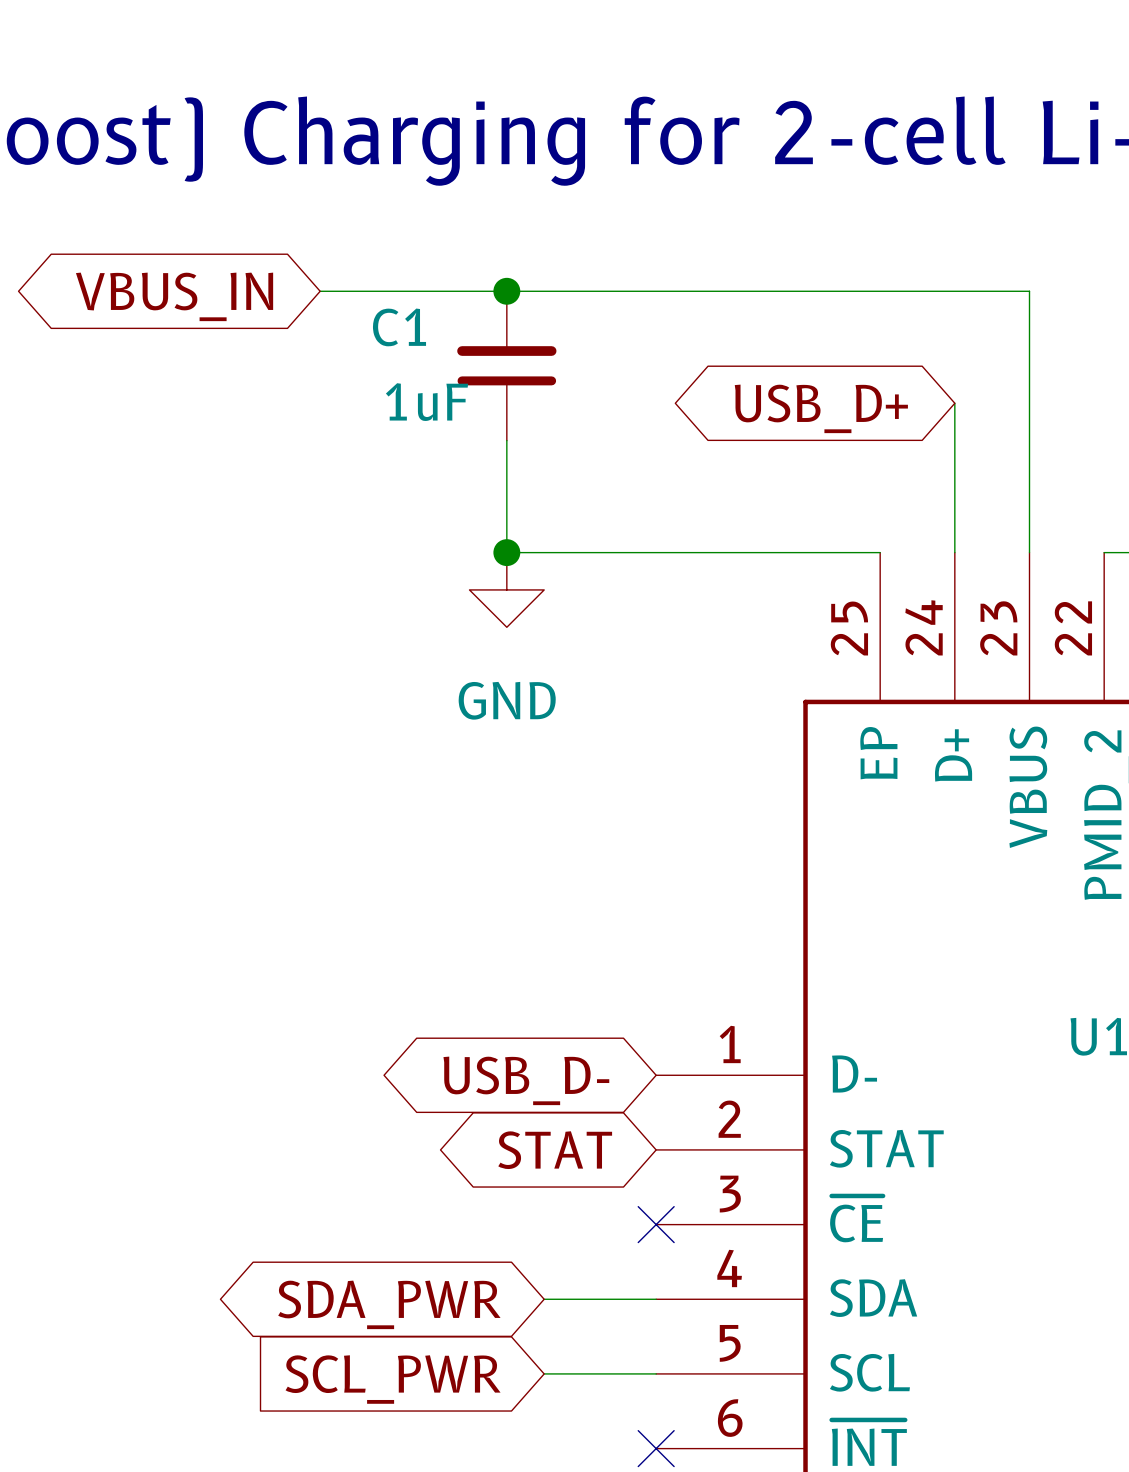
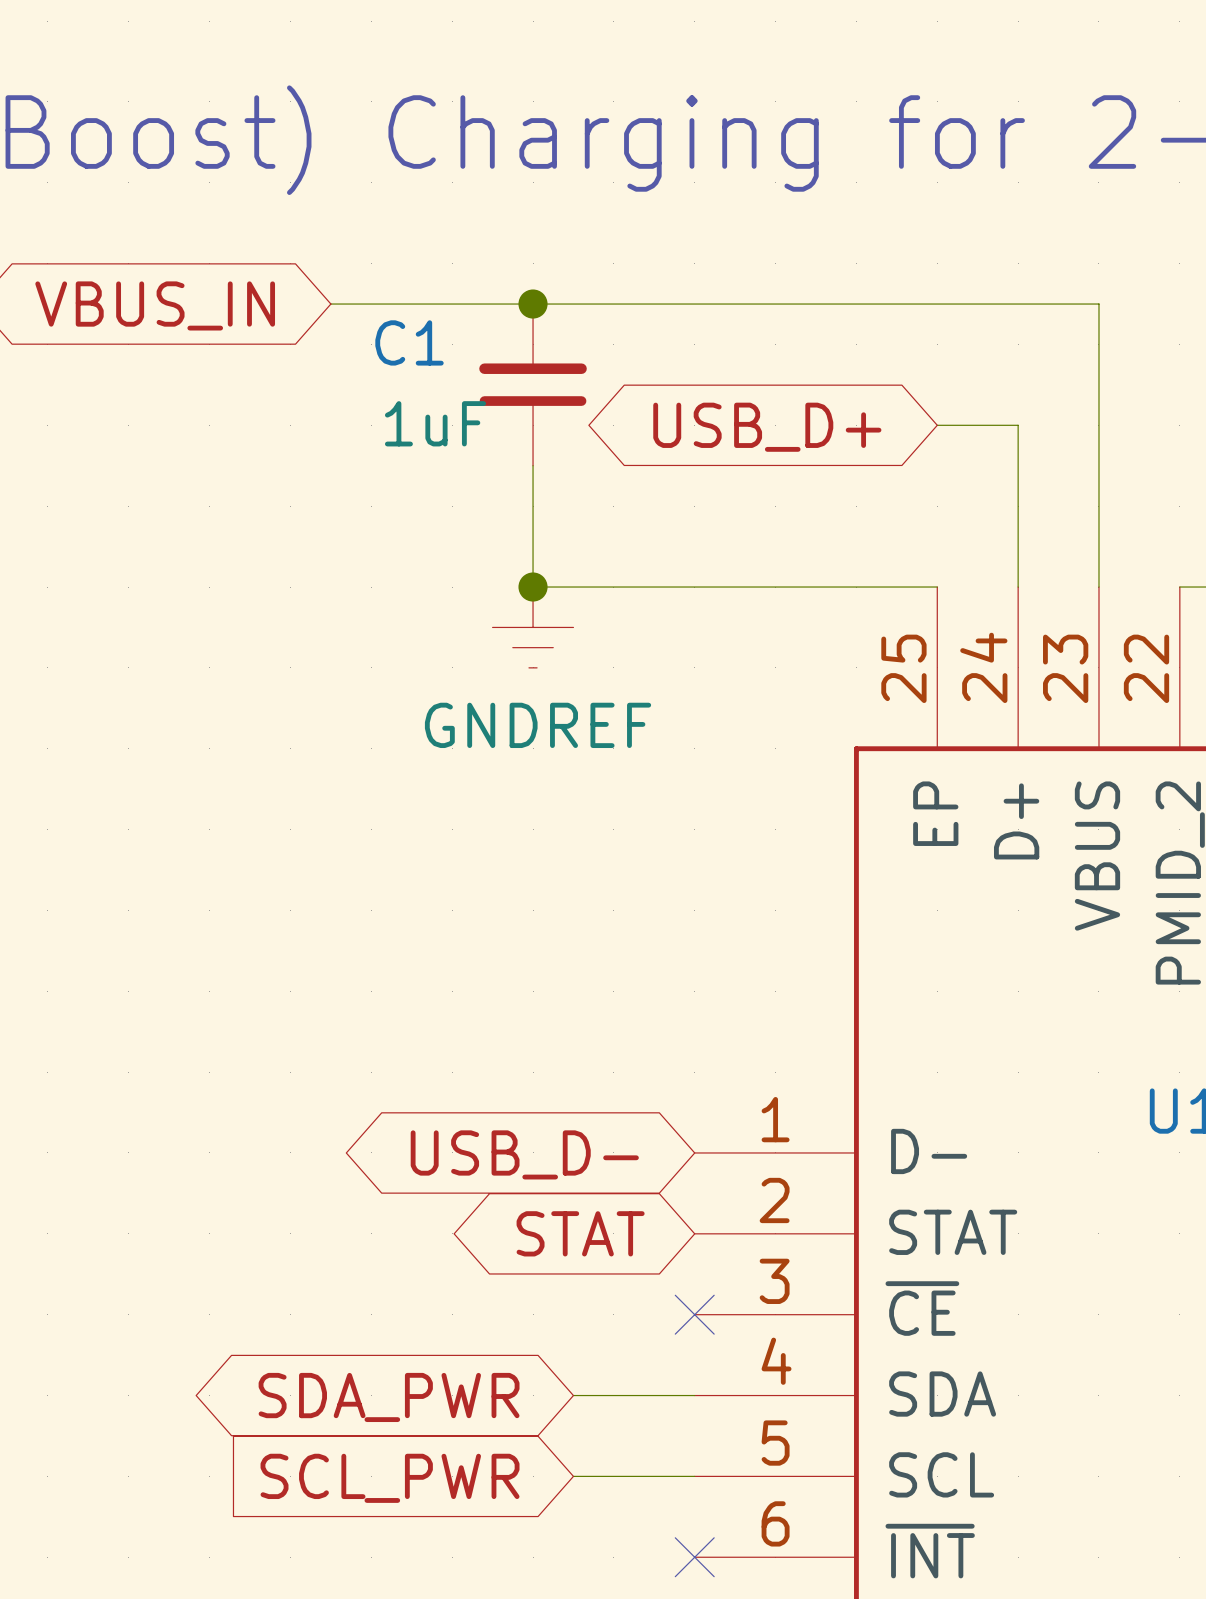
wire: none -> (937, 425) (1018, 425)
global label position: USB_D+ (821, 408) -> USB_D+ (767, 427)
power symbol: GND (506, 589) -> GNDREF (533, 627)

